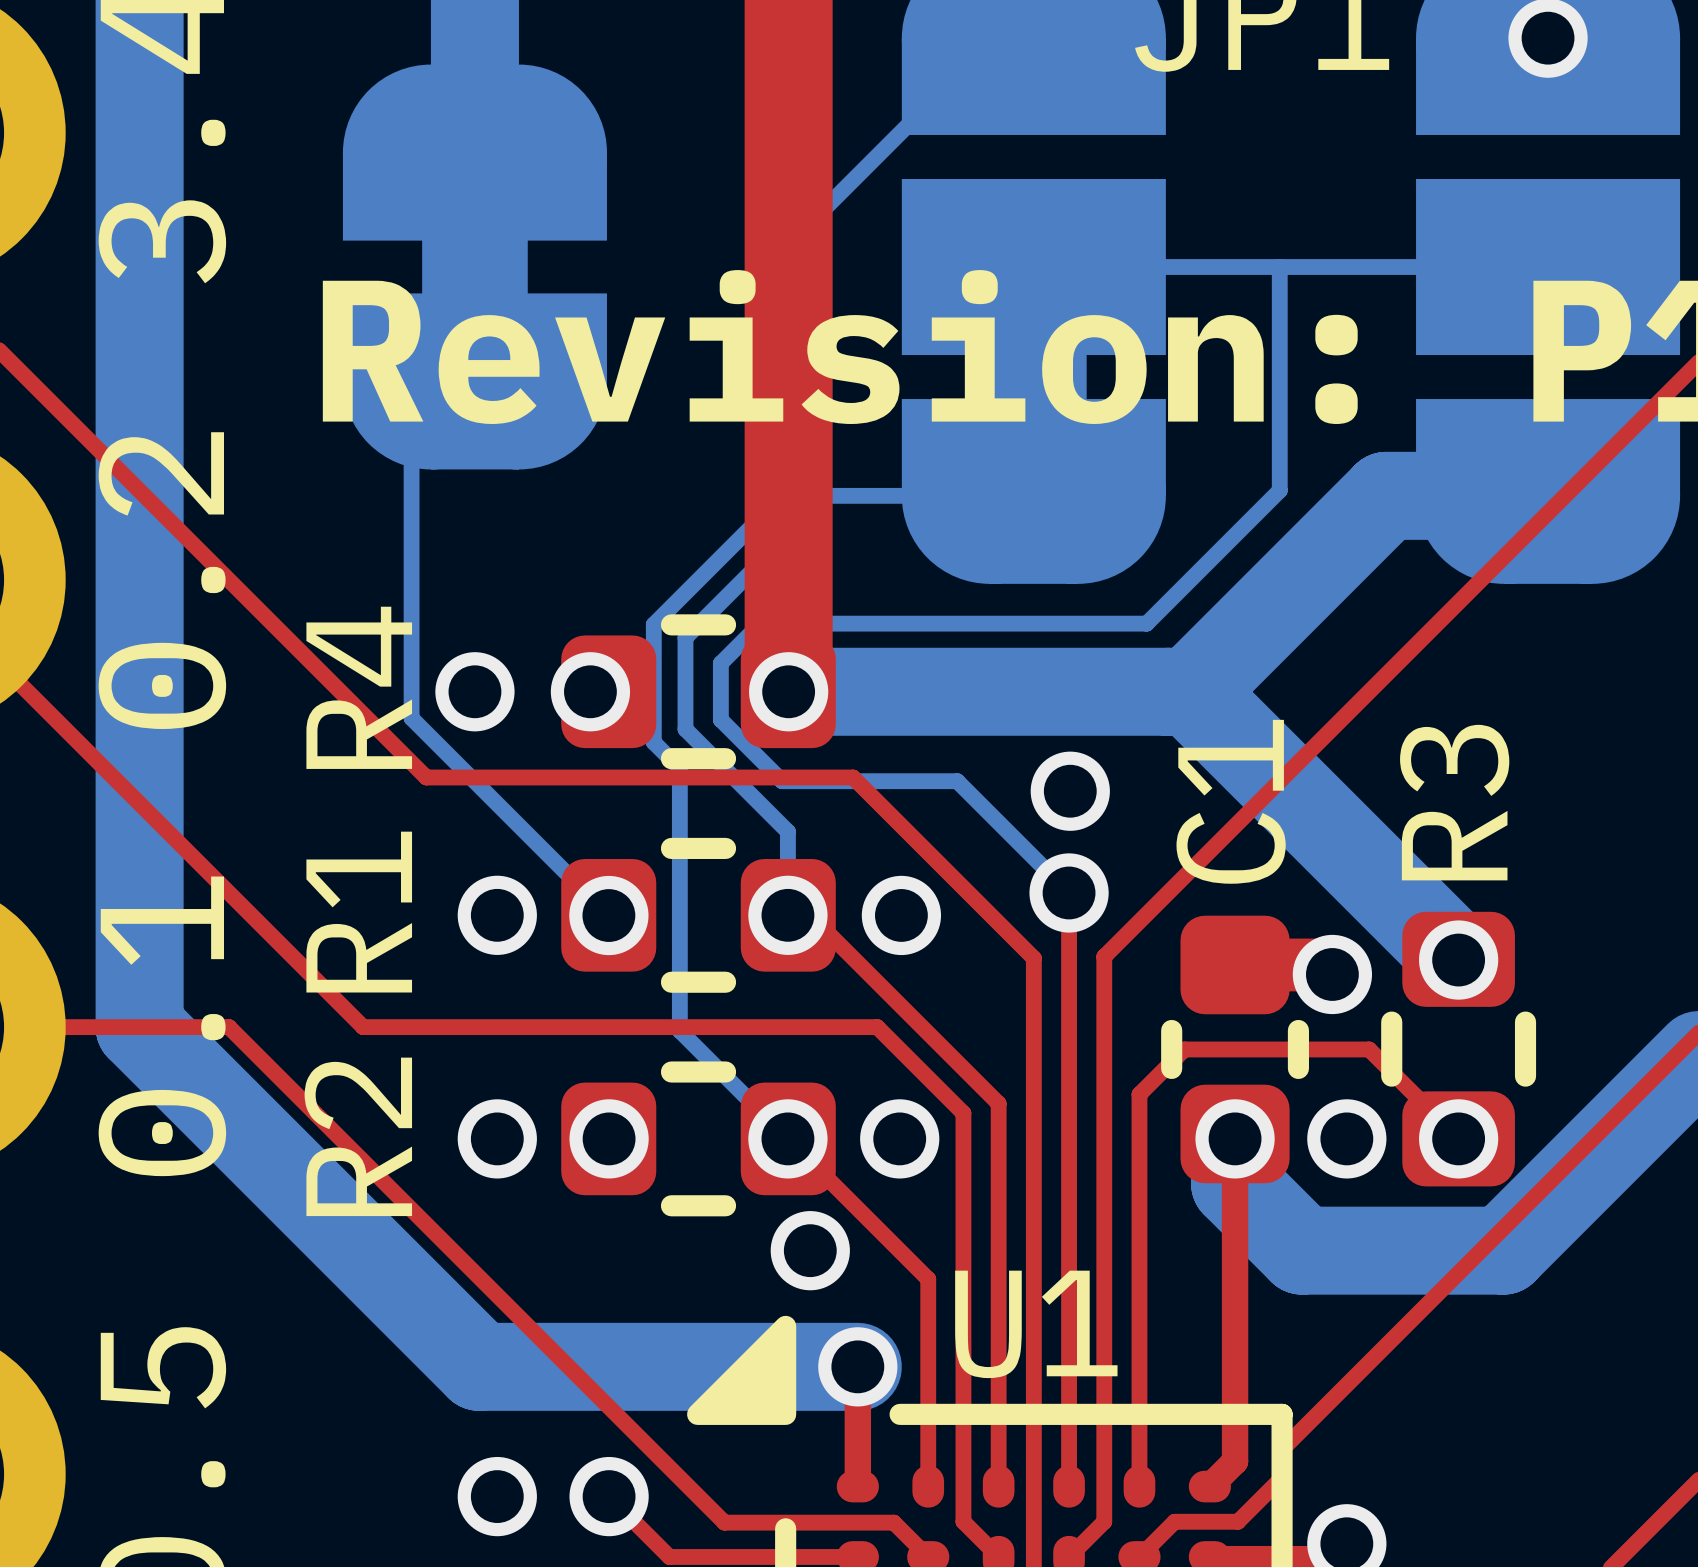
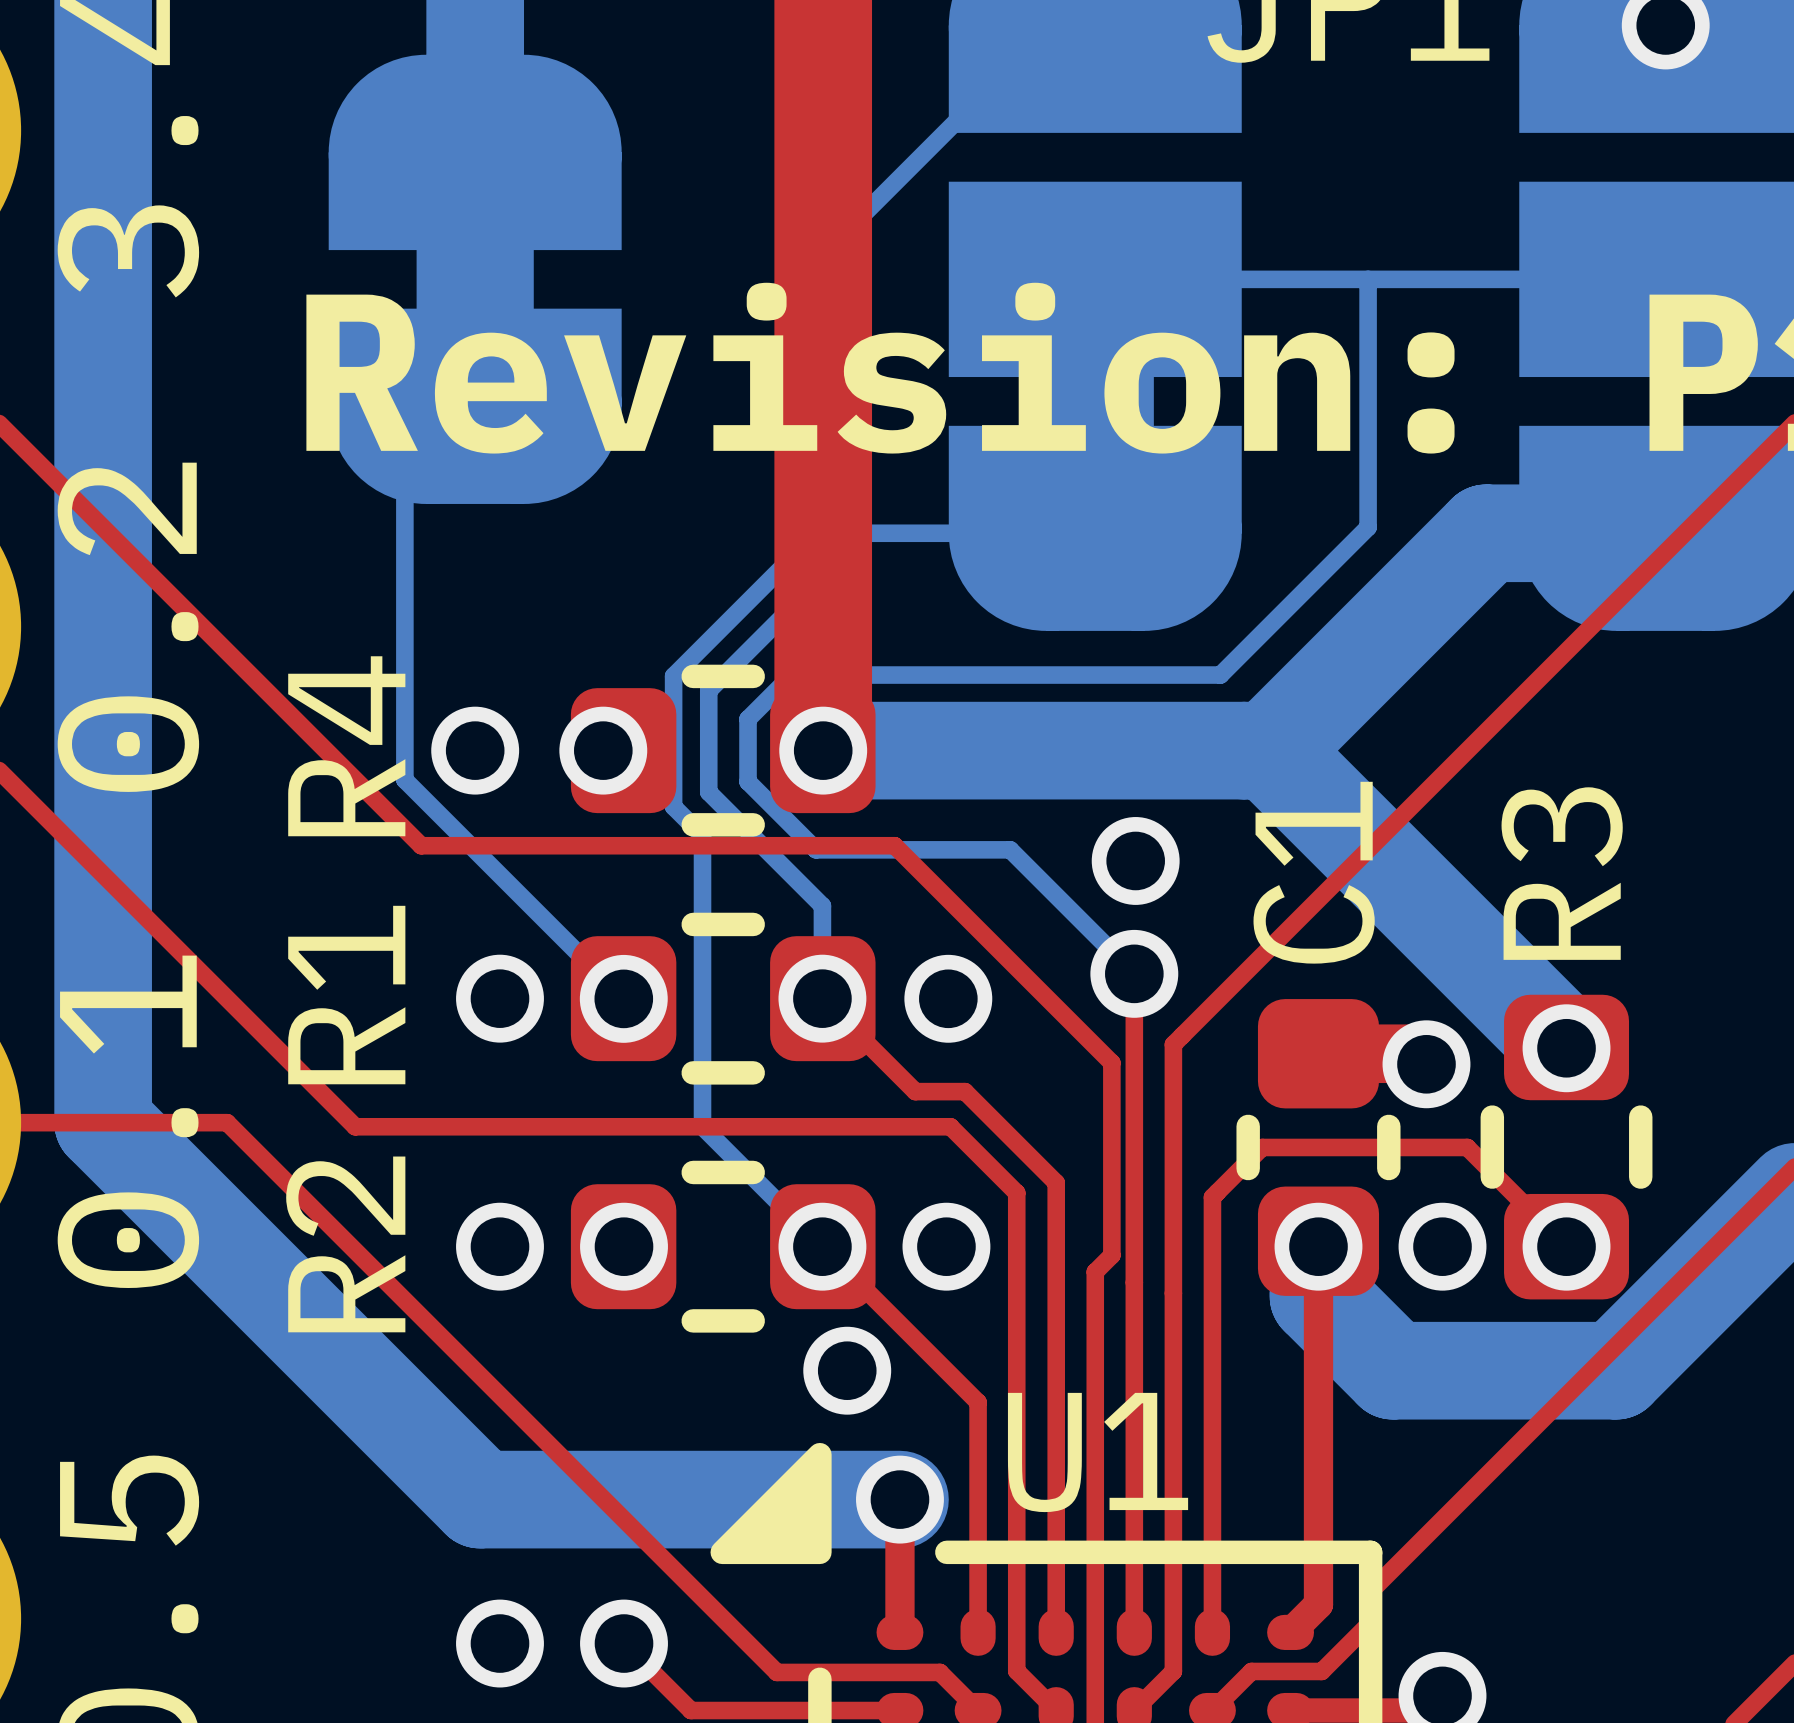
top track: (787, 915) (810, 915) (998, 1103) -> (822, 998) (915, 1091) (965, 1091) (1056, 1182) (1056, 1207)
top track: (1033, 958) (1033, 1161) -> (1095, 1046) (1111, 1062) (1111, 1255) (1095, 1271)
top track: (229, 1027) (724, 1522) (746, 1522) -> (202, 1122) (227, 1122) (776, 1672)
top track: (363, 1027) (877, 1027) (963, 1113) -> (351, 1122) (355, 1126) (950, 1126) (1016, 1192) (1017, 1218)

